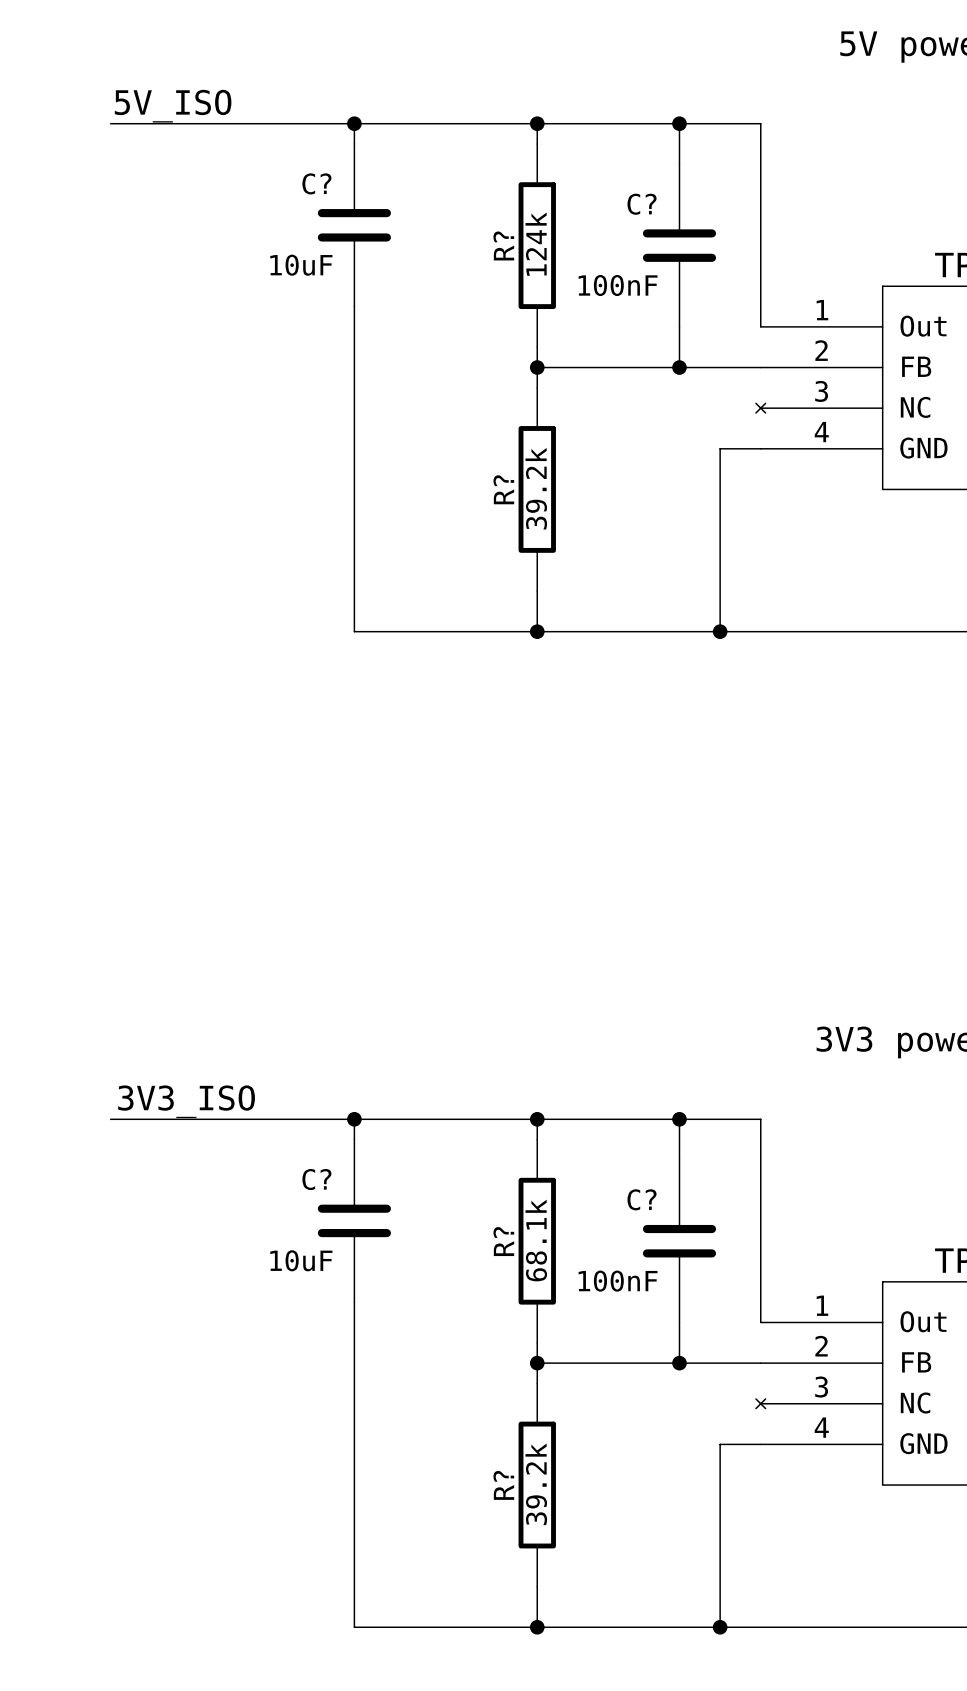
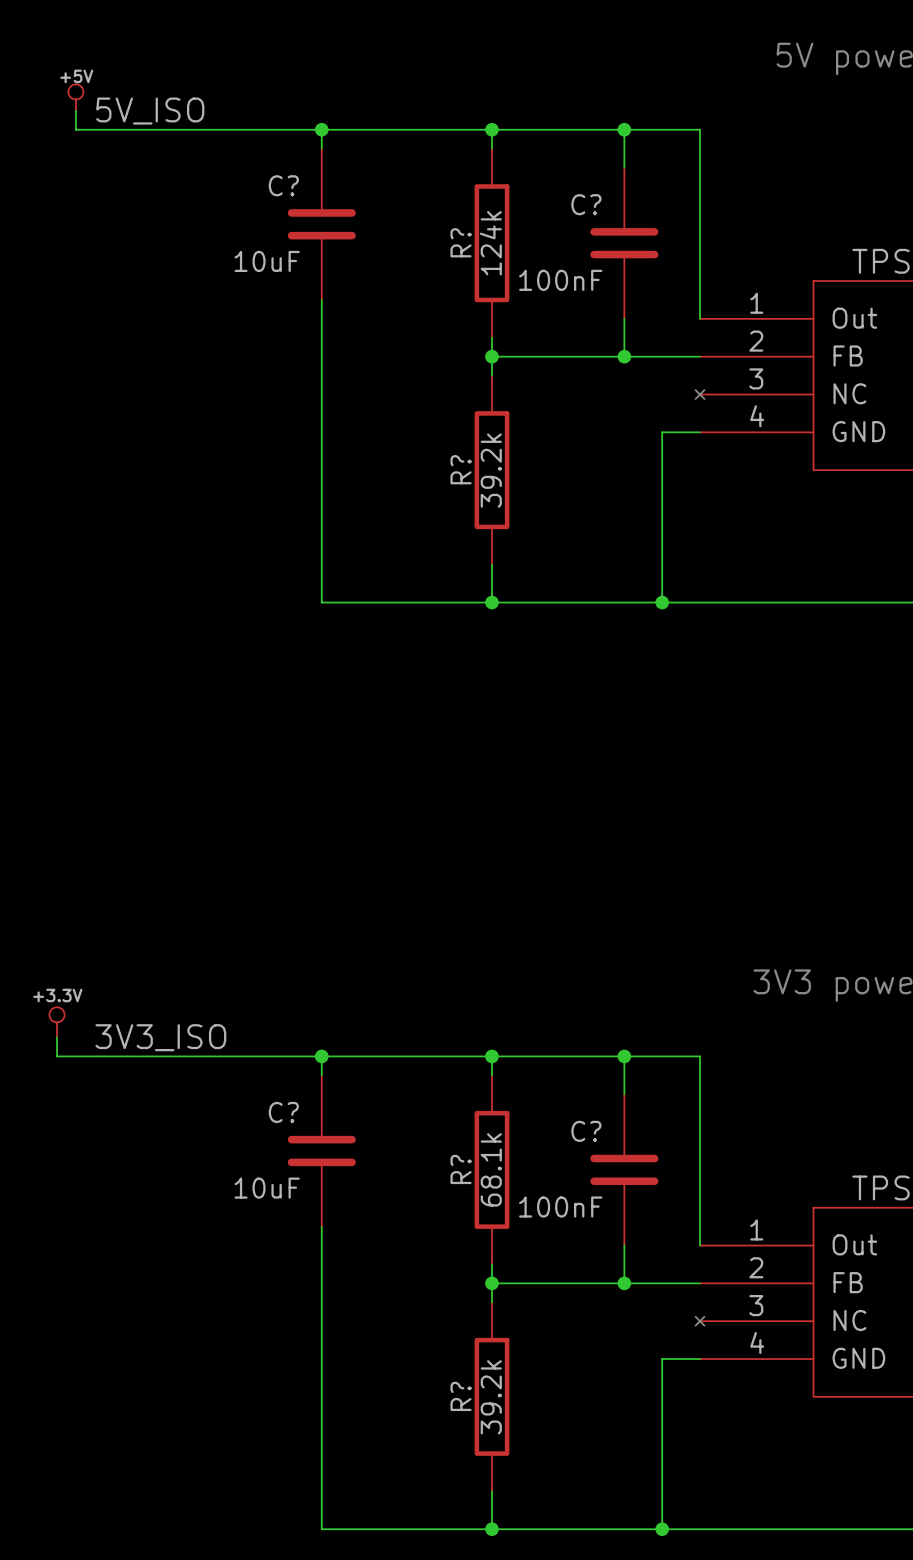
power symbol: none -> +5V (75, 97)
wire: none -> (75, 110) (75, 129) (94, 129)
power symbol: none -> +3.3V (57, 1022)
wire: none -> (57, 1037) (57, 1056) (94, 1056)

